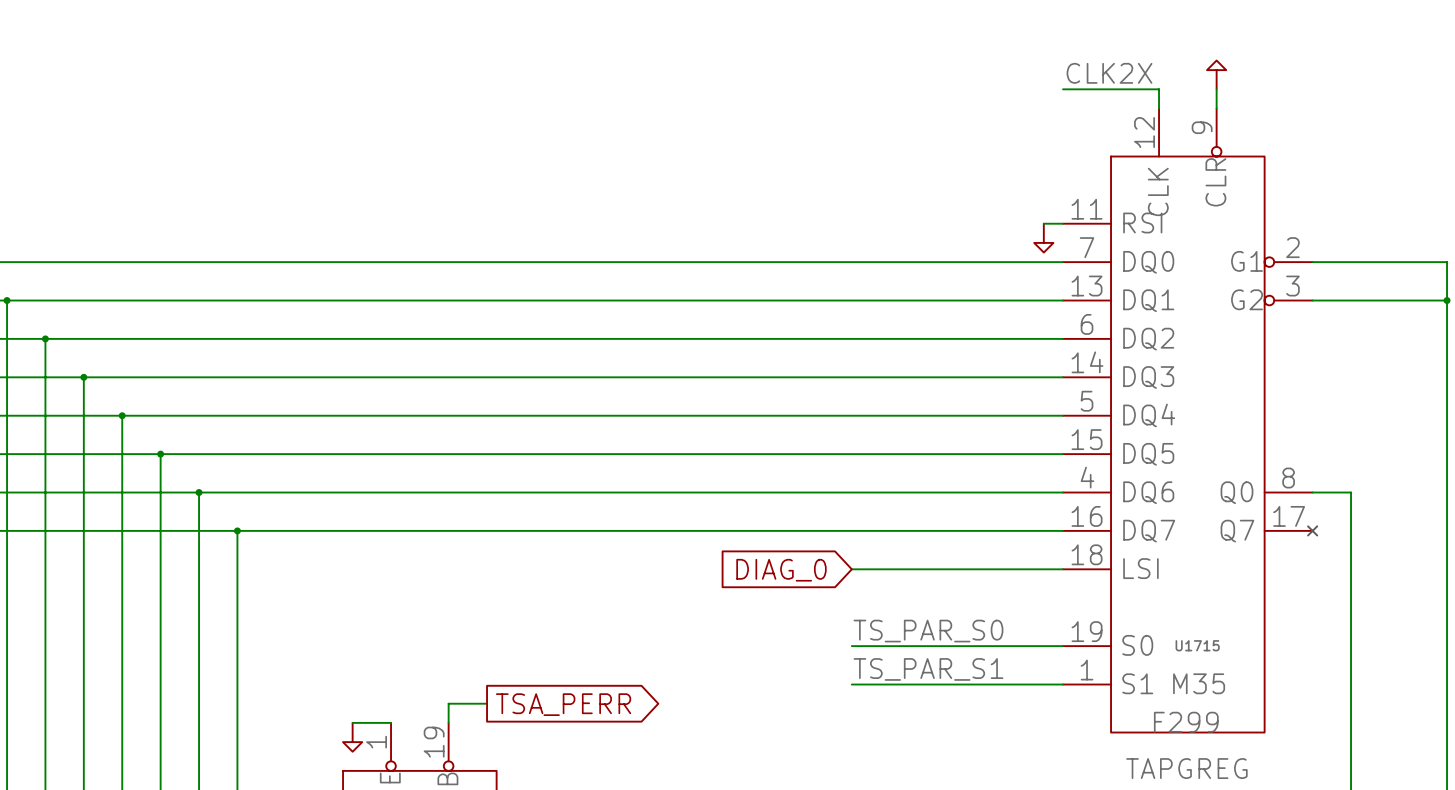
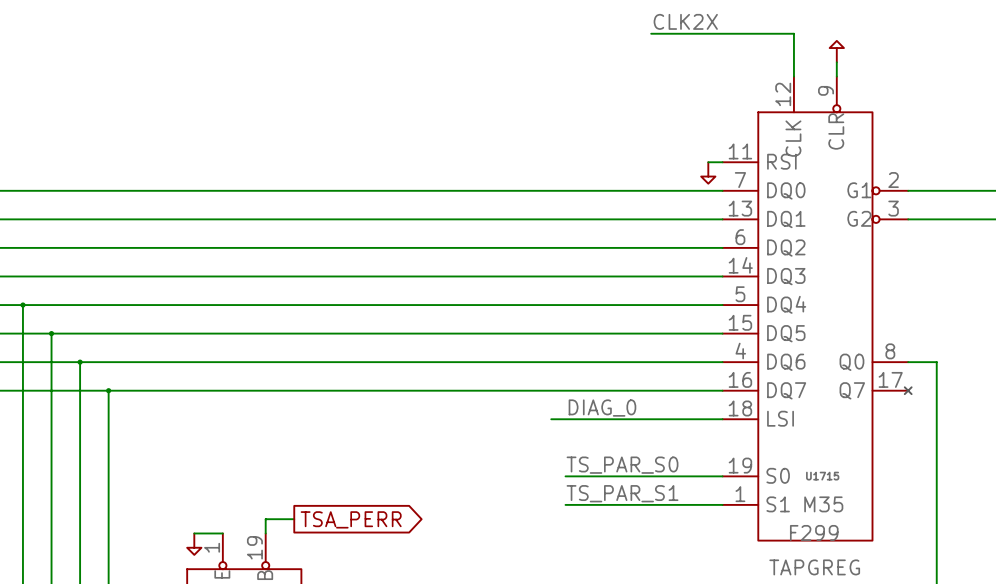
label position: CLK2X (1109, 73) -> CLK2X (685, 21)
wire: (1063, 89) (1159, 89) -> (651, 33) (793, 33) (793, 62)
label: none -> DIAG_0 (602, 408)
wire: none -> (551, 419) (565, 419)
global label: DIAG_0 (781, 570) -> none

